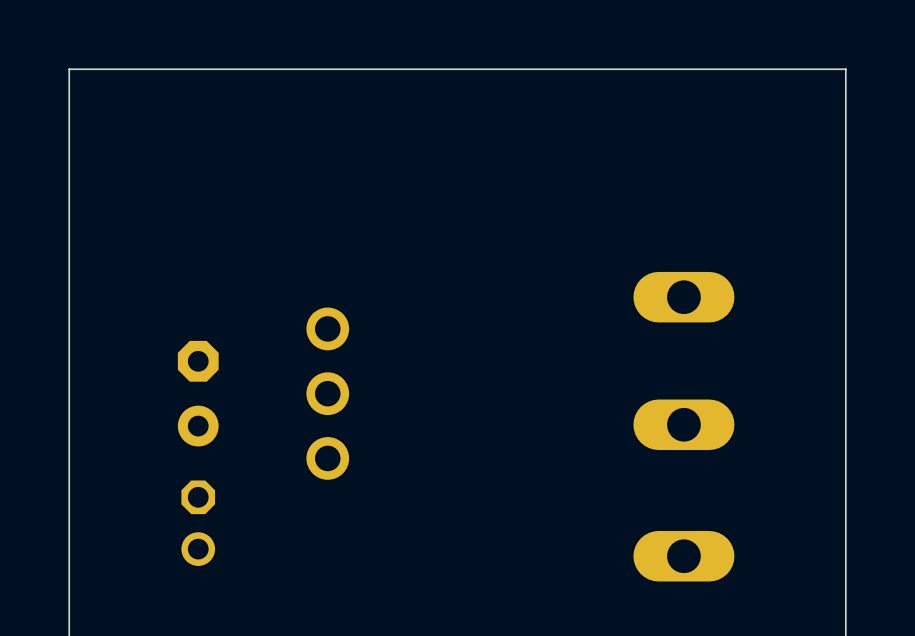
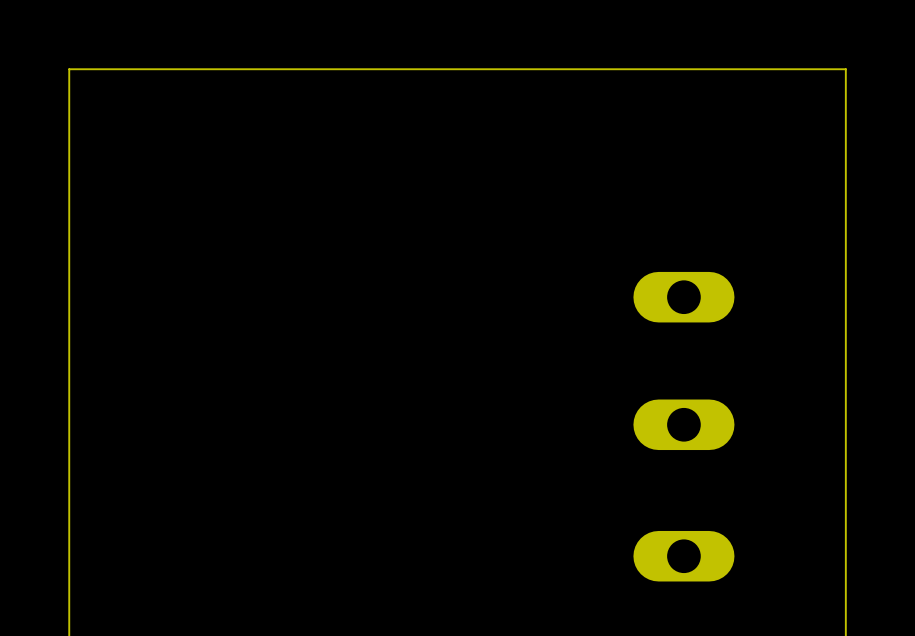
part: (198, 393) -> none
part: (327, 393) -> none
part: (198, 523) -> none

